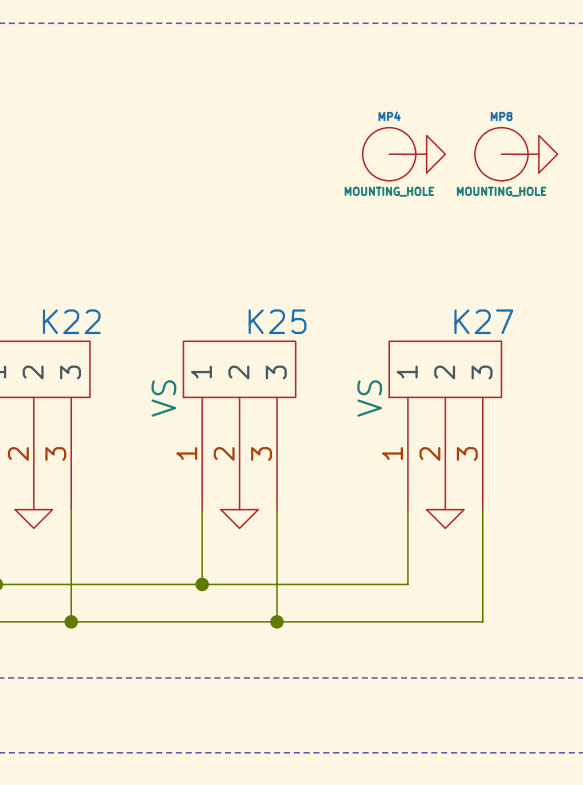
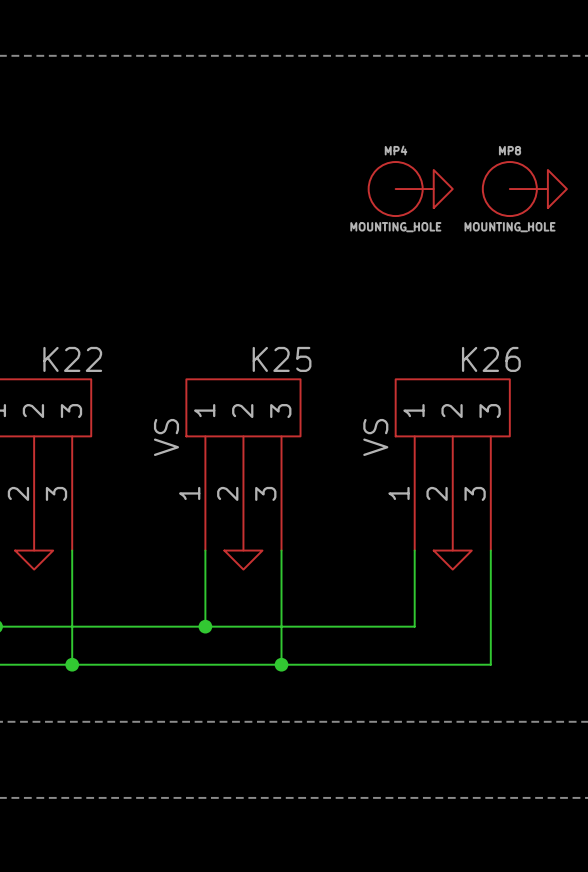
K27 name: K27 (483, 321) -> K26 (491, 359)

